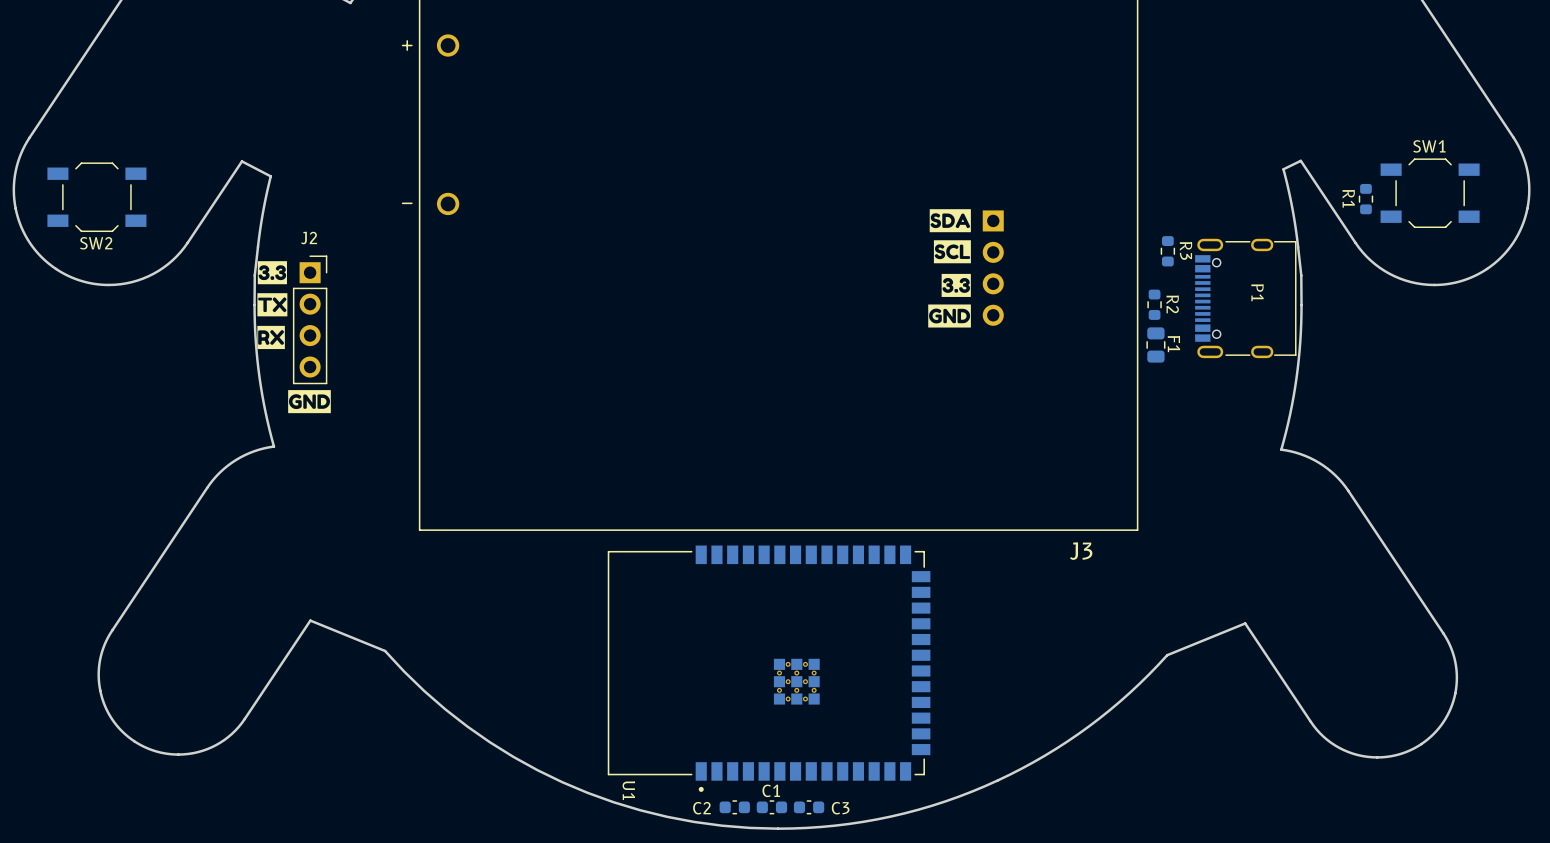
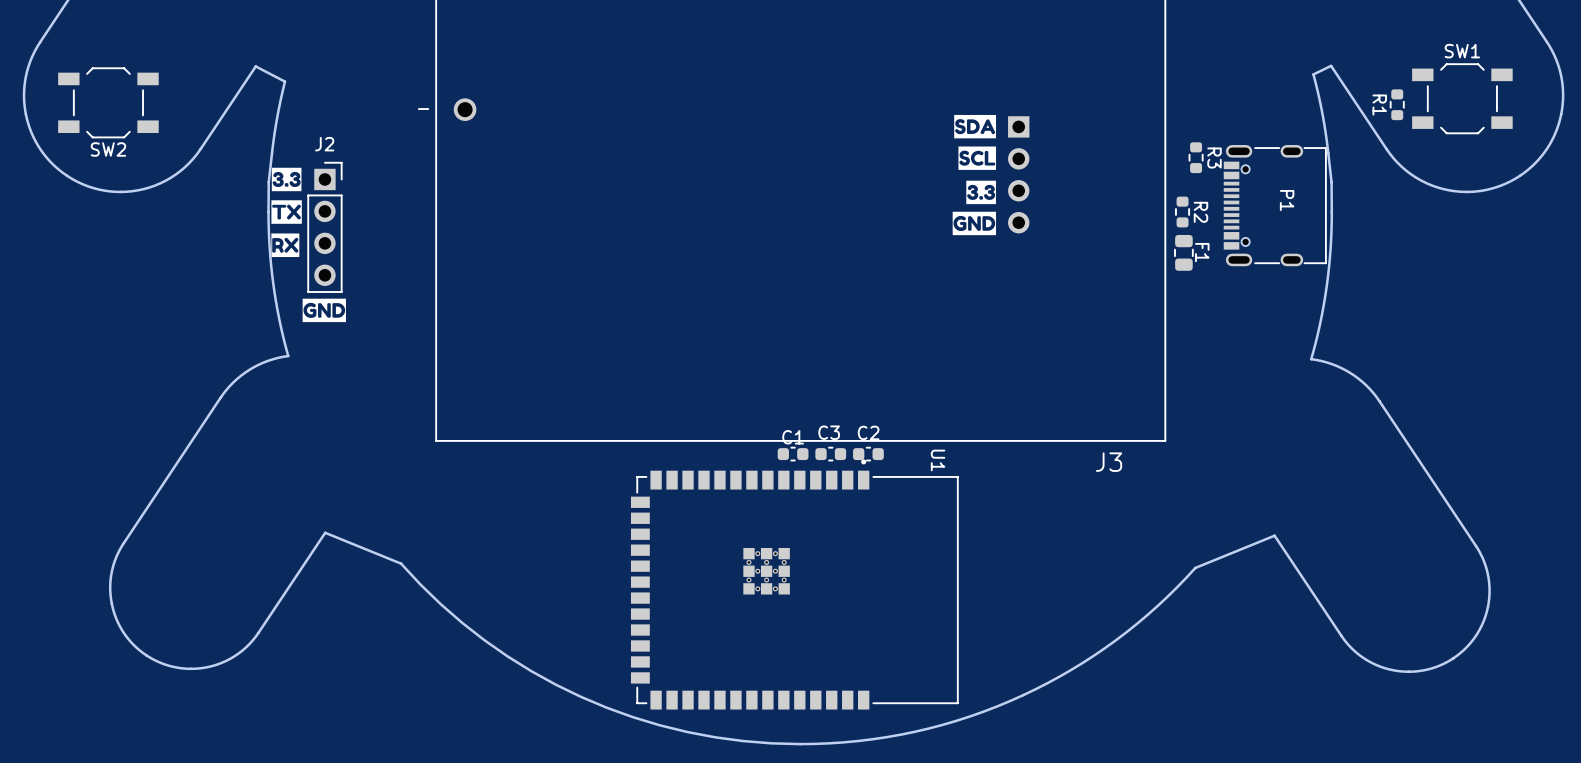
U1 rotation: 0° (769, 668) -> 180° (794, 584)
C2 position: (734, 807) -> (868, 454)
C1 position: (771, 807) -> (793, 454)
C3 position: (809, 807) -> (830, 454)
C2 name position: C2 (701, 808) -> C2 (868, 432)
C3 name position: C3 (840, 808) -> C3 (829, 432)

